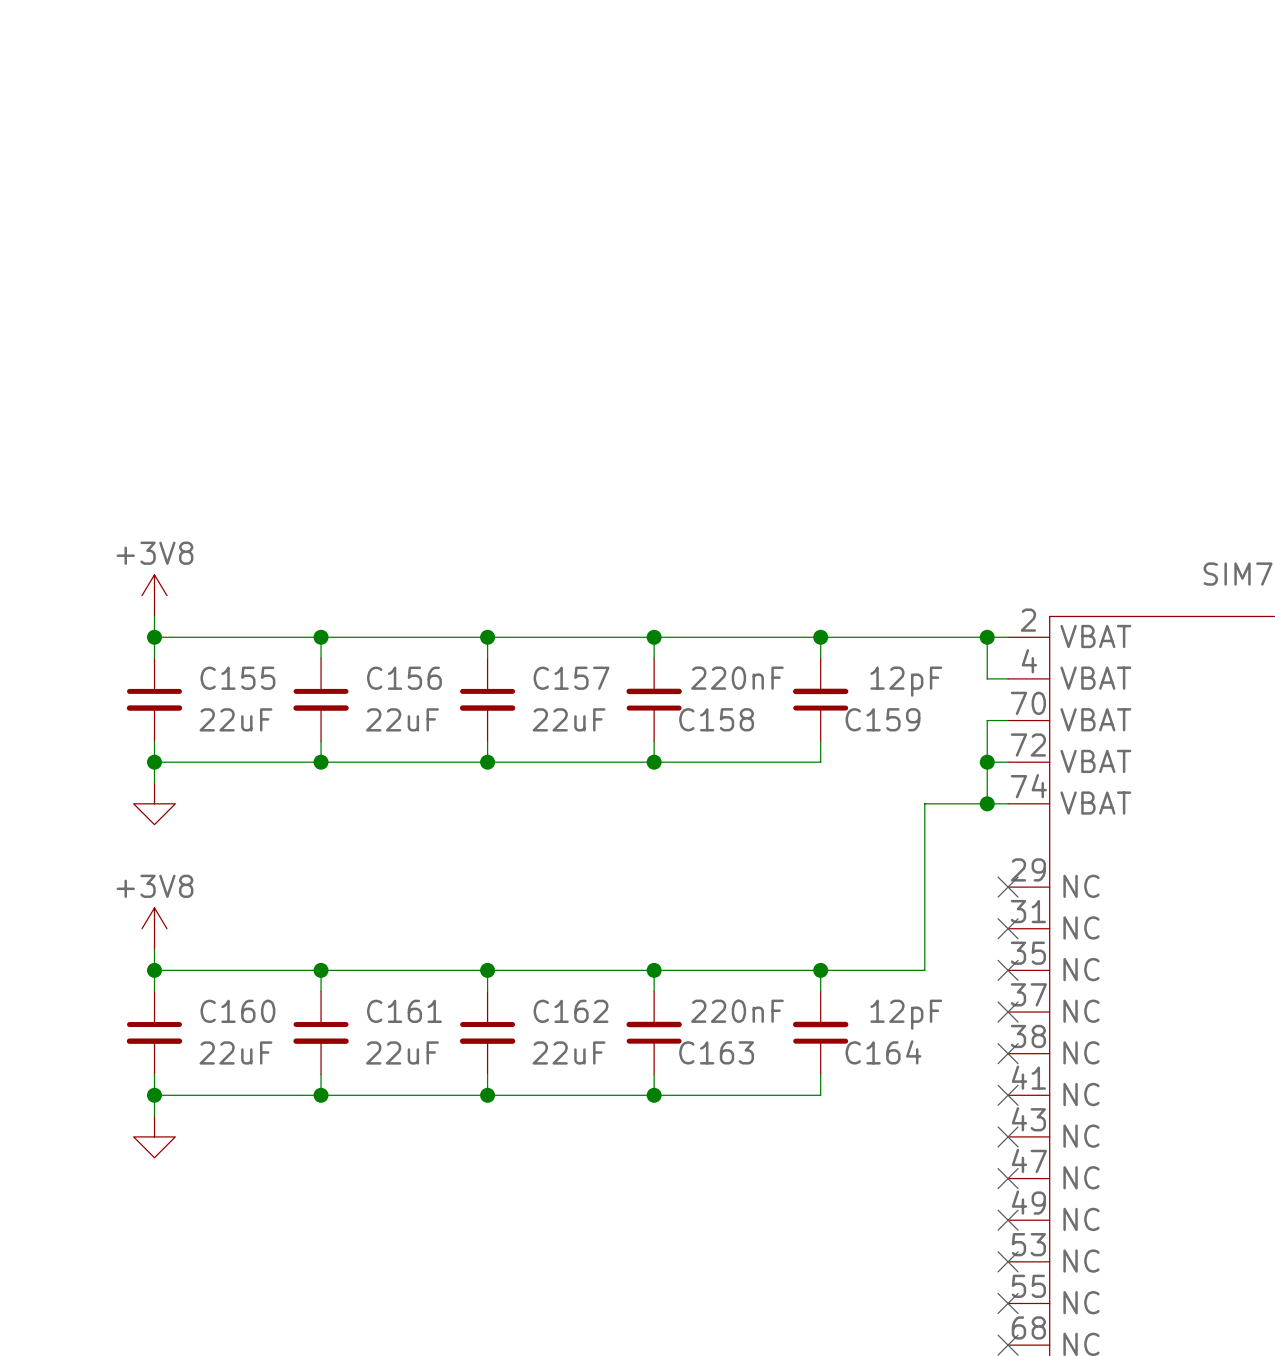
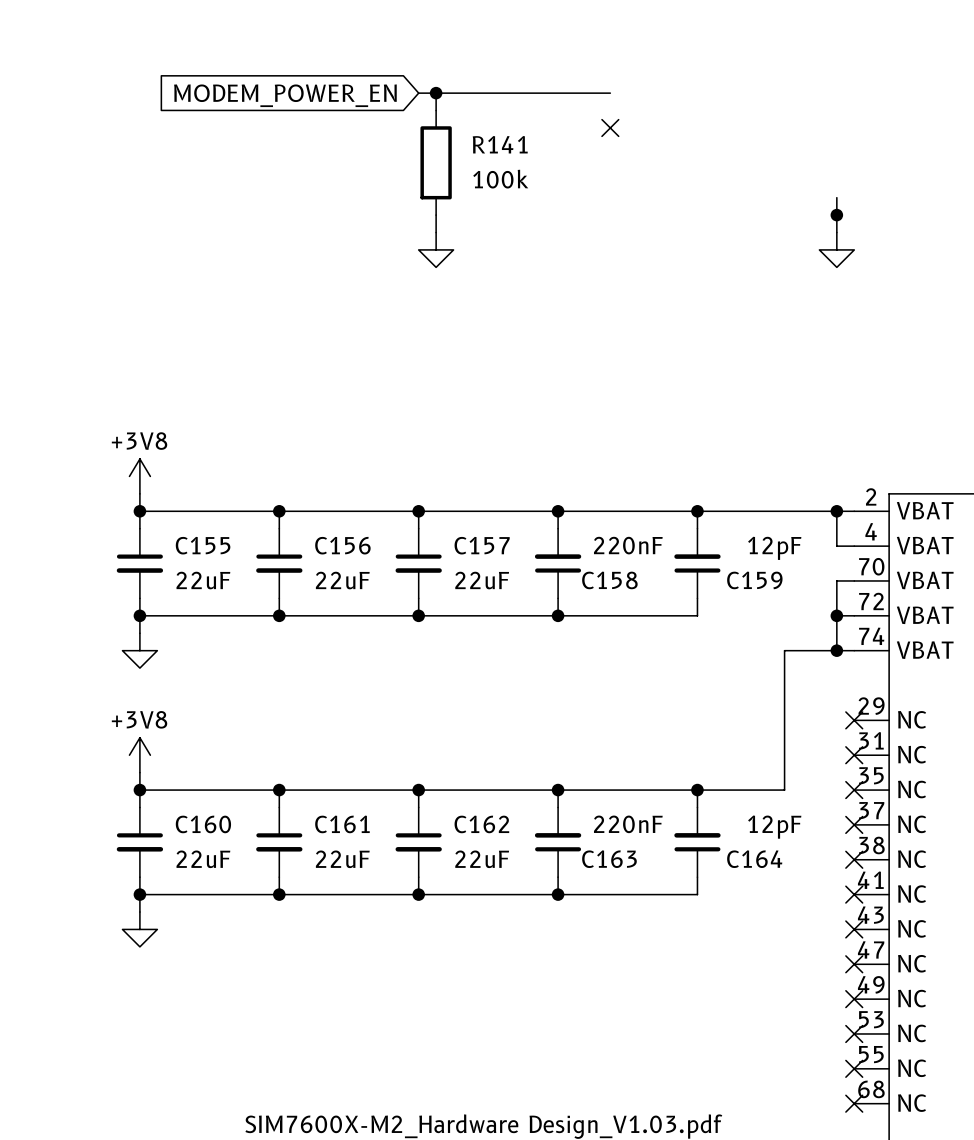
wire: none -> (418, 93) (610, 93)
wire: none -> (436, 93) (436, 110)
junction: none -> (436, 93)
global label: none -> MODEM_POWER_EN (285, 95)
no-connect mark: none -> (610, 127)
R141: none -> 100k (436, 162)
wire: none -> (836, 197) (836, 232)
wire: none -> (436, 215) (436, 232)
junction: none -> (836, 215)
power symbol: none -> (436, 249)
power symbol: none -> (836, 249)

